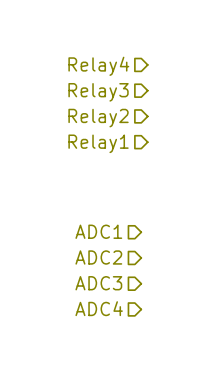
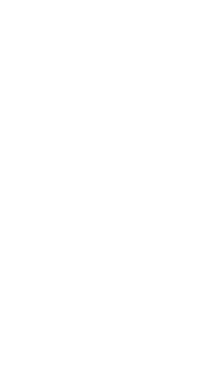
hierarchical label: Relay4 (98, 66) -> none
hierarchical label: Relay3 (98, 92) -> none
hierarchical label: Relay2 (98, 118) -> none
hierarchical label: Relay1 (98, 143) -> none
hierarchical label: ADC1 (98, 231) -> none
hierarchical label: ADC2 (98, 257) -> none
hierarchical label: ADC3 (98, 283) -> none
hierarchical label: ADC4 (99, 308) -> none

